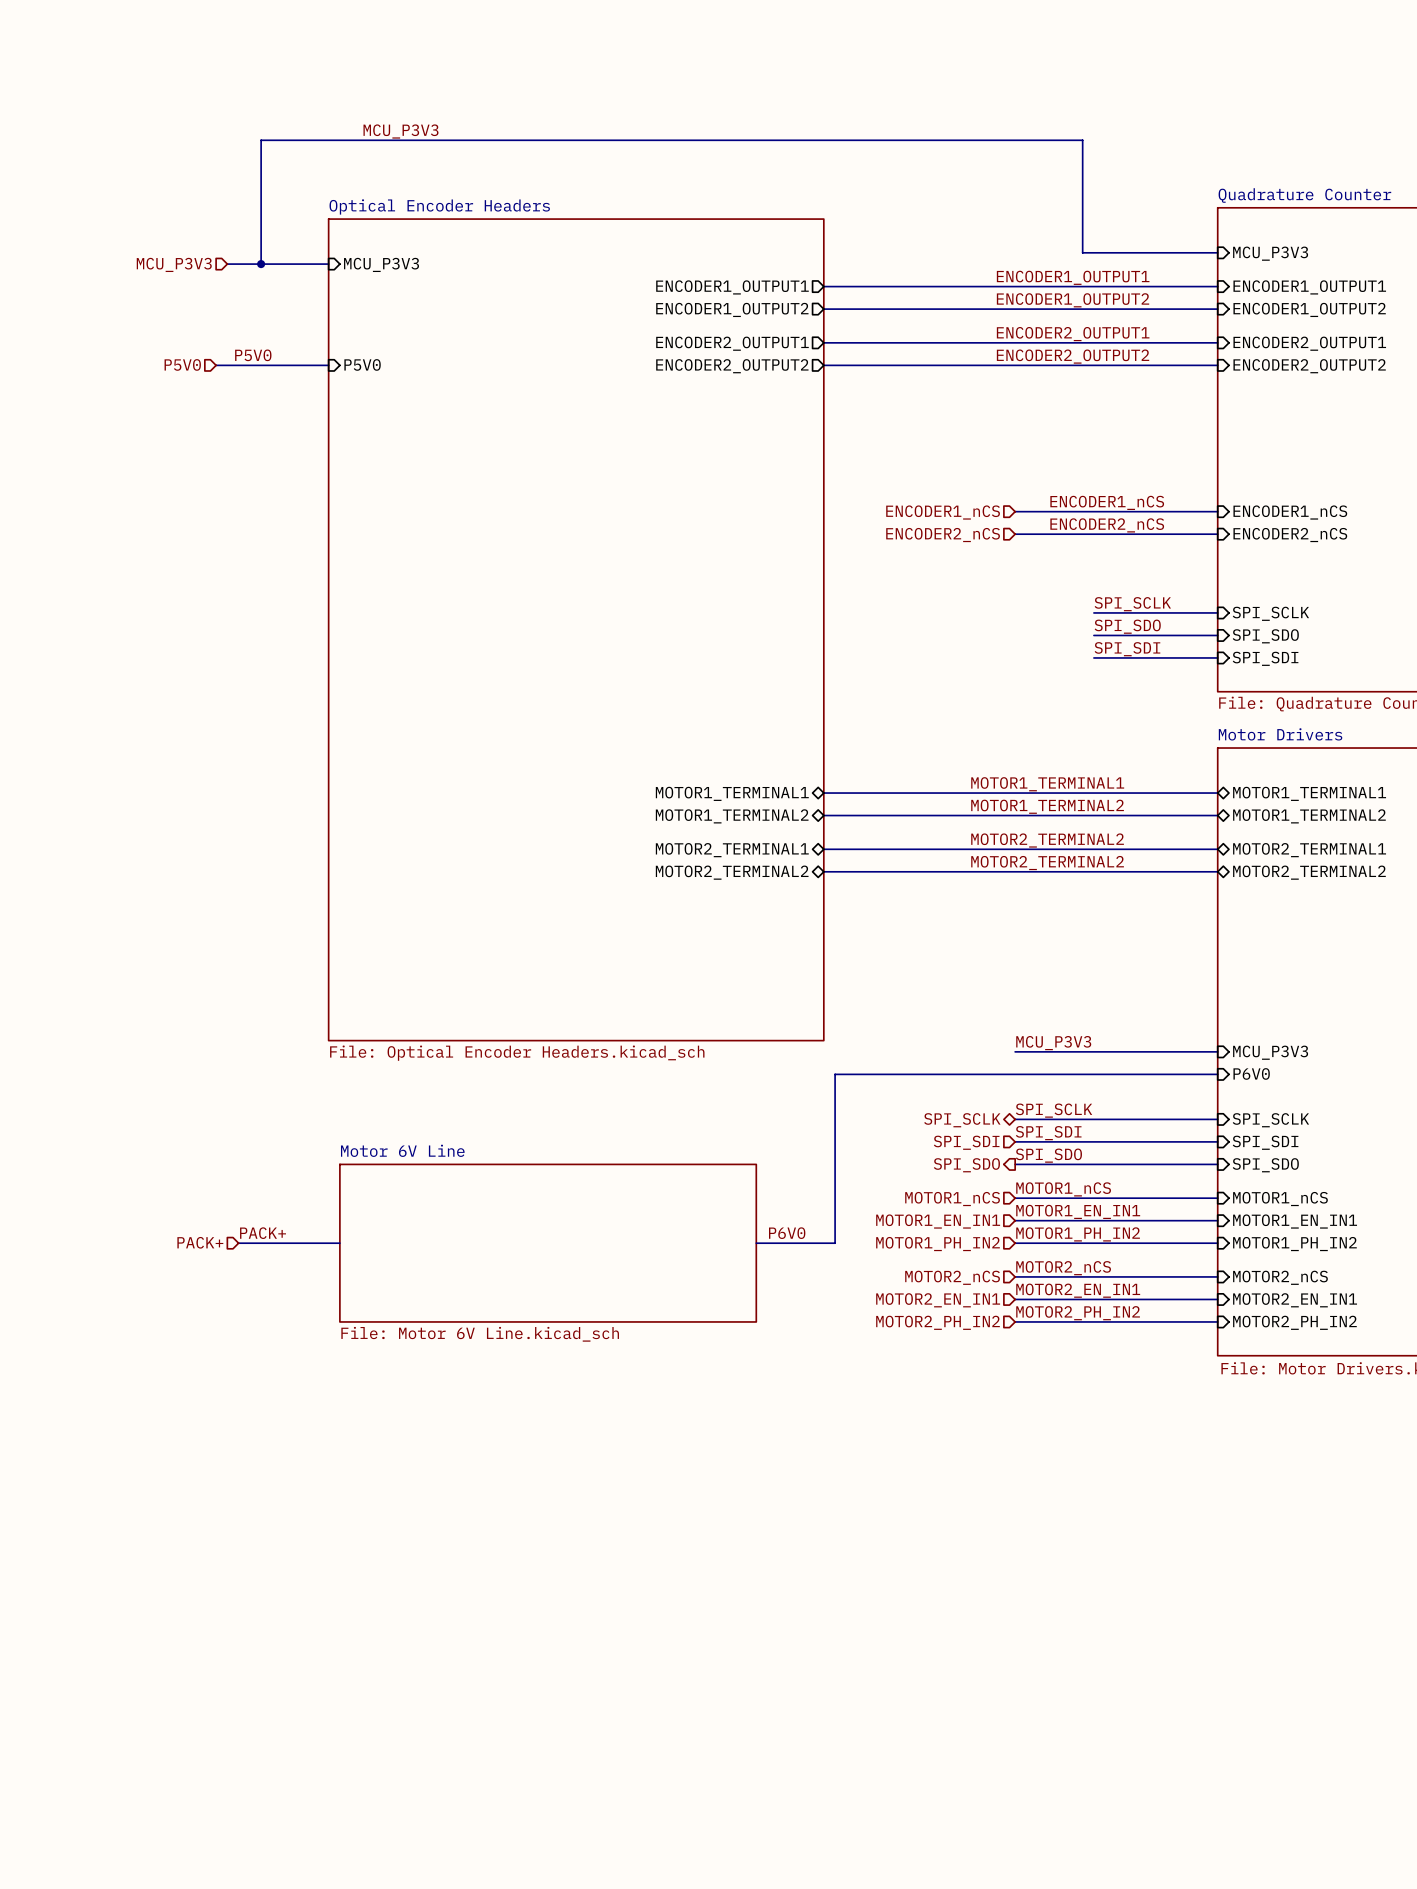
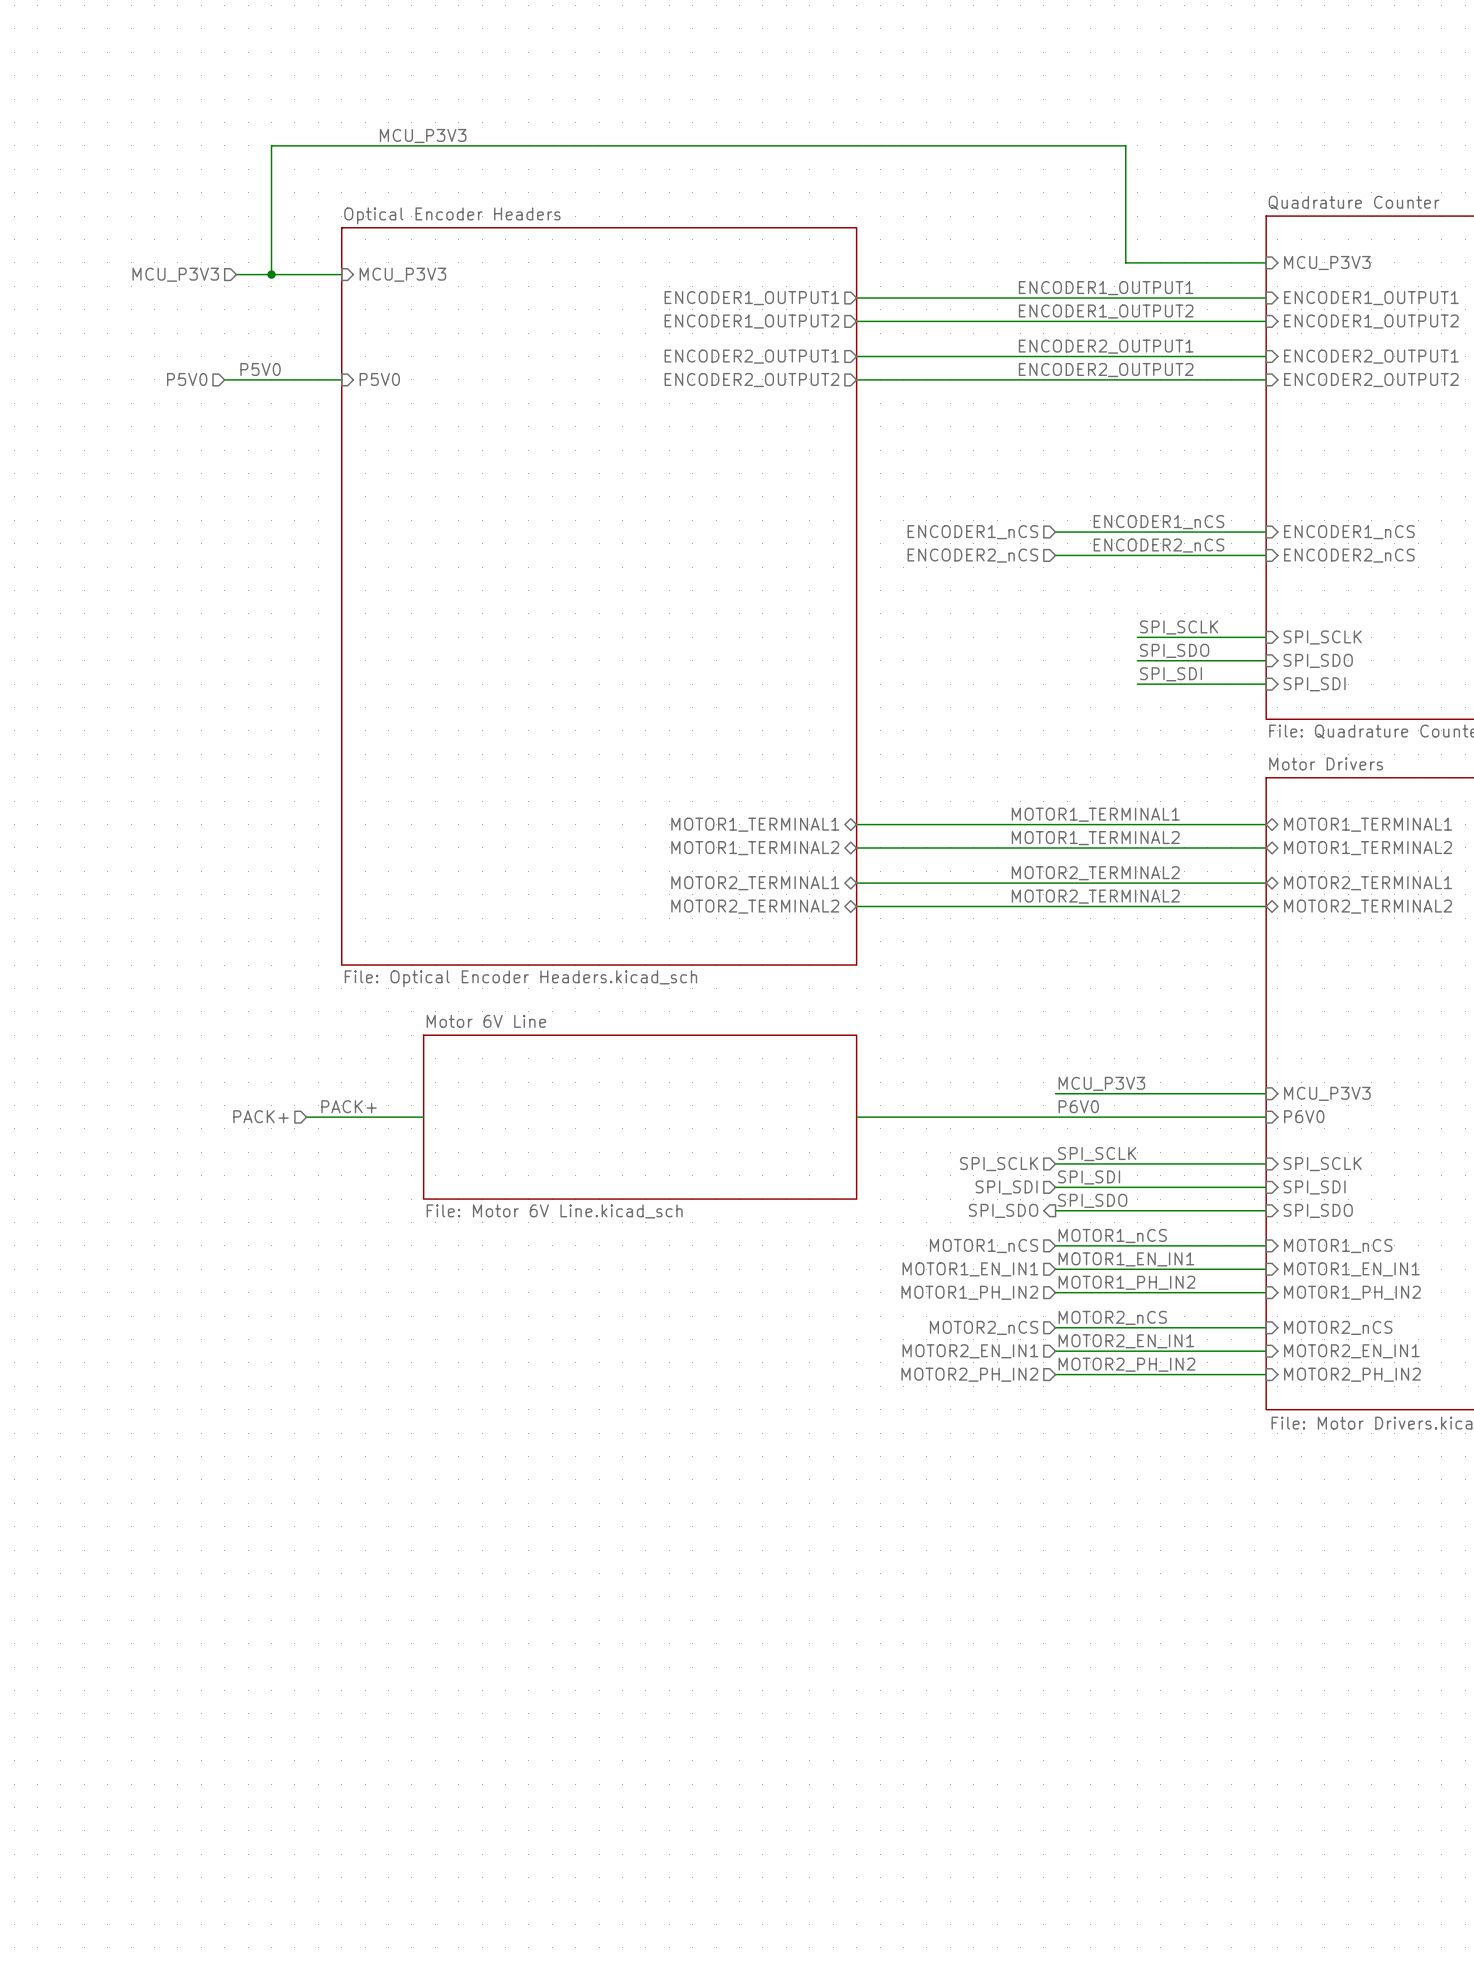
sheet Optical Encoder Headers: none -> File: Optical Encoder Headers.kicad_sch (599, 596)
sheet Optical Encoder Headers: File: Optical Encoder Headers.kicad_sch (576, 629) -> none
label: none -> P6V0 (1078, 1106)
wire: none -> (306, 1117) (423, 1117)
wire: (835, 1074) (835, 1243) (756, 1243) -> (868, 1117) (856, 1117)
hierarchical label shape: bidirectional (962, 1120) -> input (999, 1164)
label position: PACK+ (263, 1233) -> PACK+ (349, 1106)
label: P6V0 (787, 1233) -> none
hierarchical label position: PACK+ (200, 1242) -> PACK+ (261, 1116)
wire: (238, 1243) (339, 1243) -> none
sheet Motor 6V Line position: (548, 1243) -> (640, 1117)

